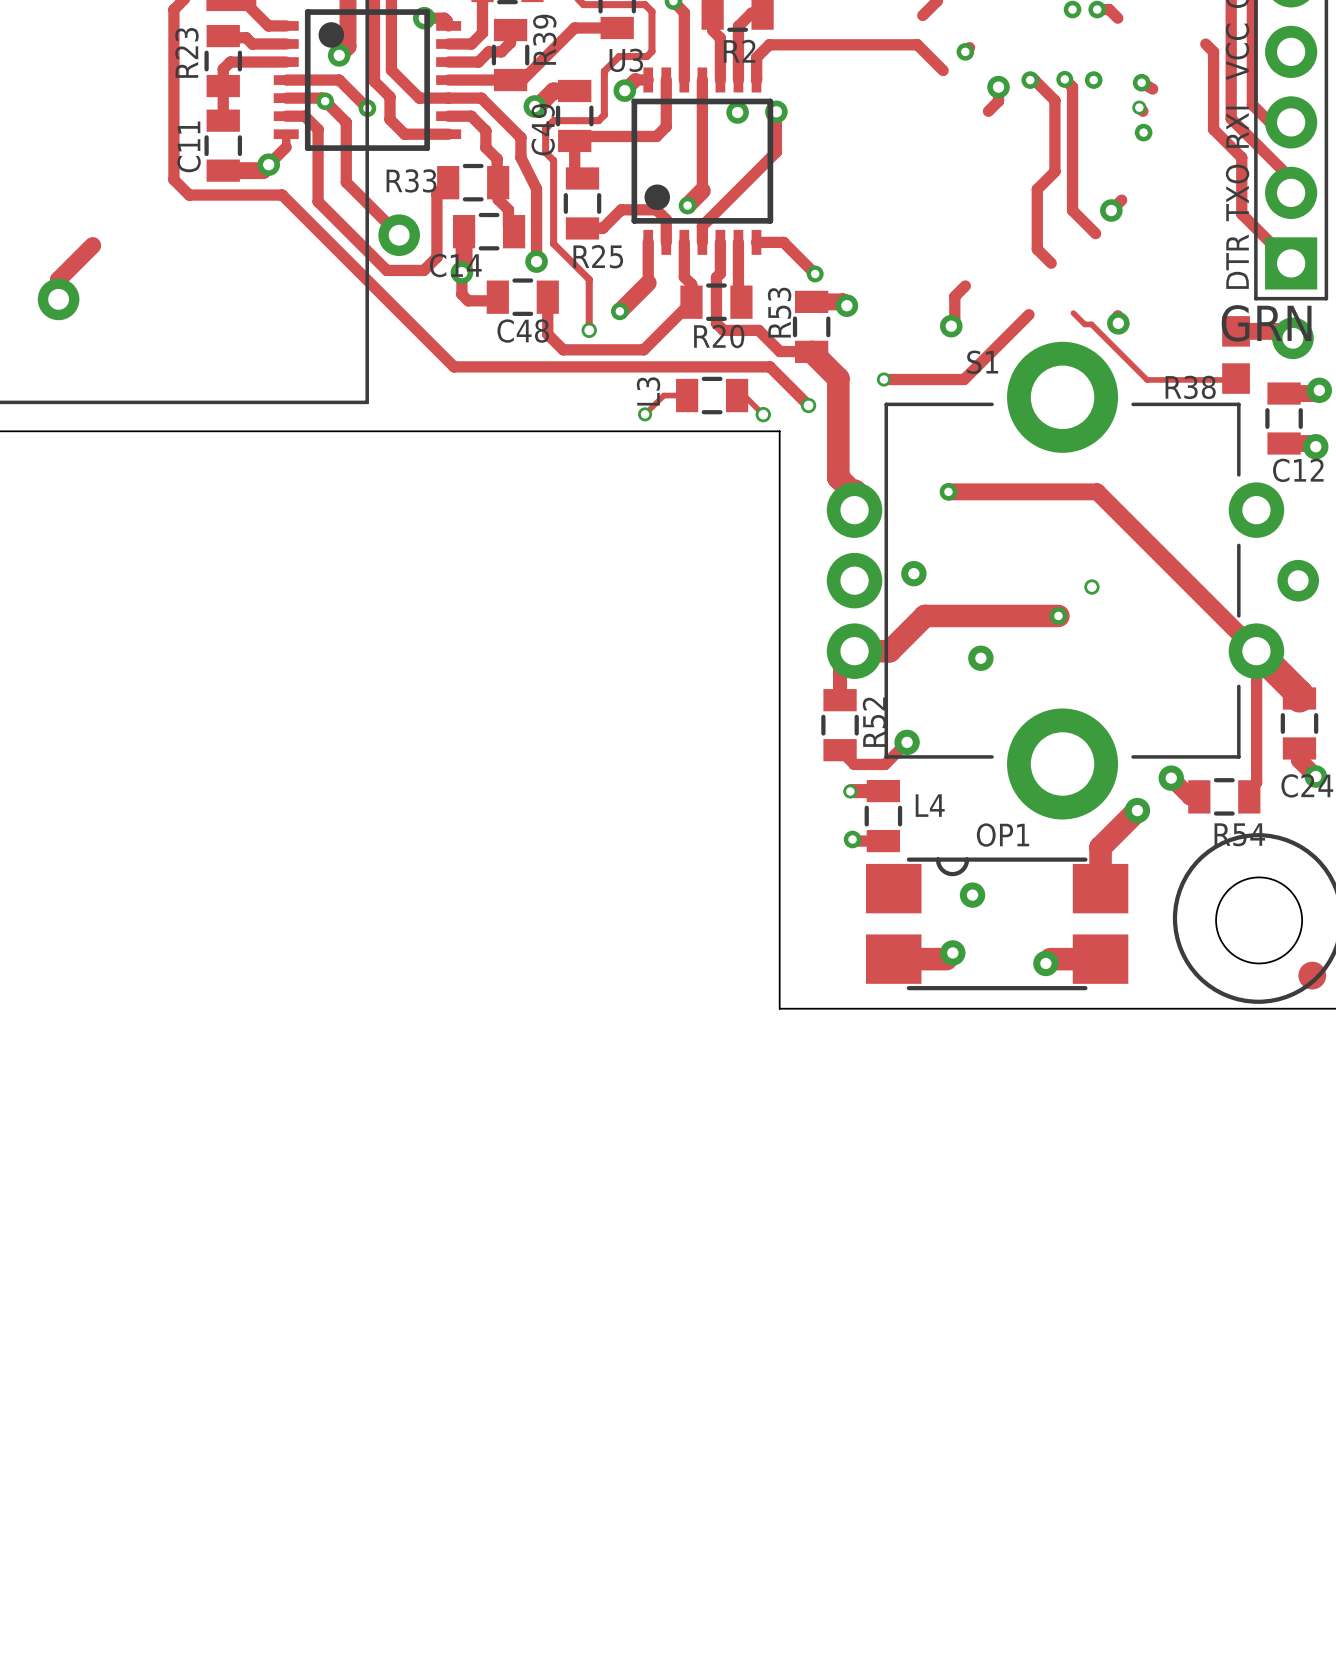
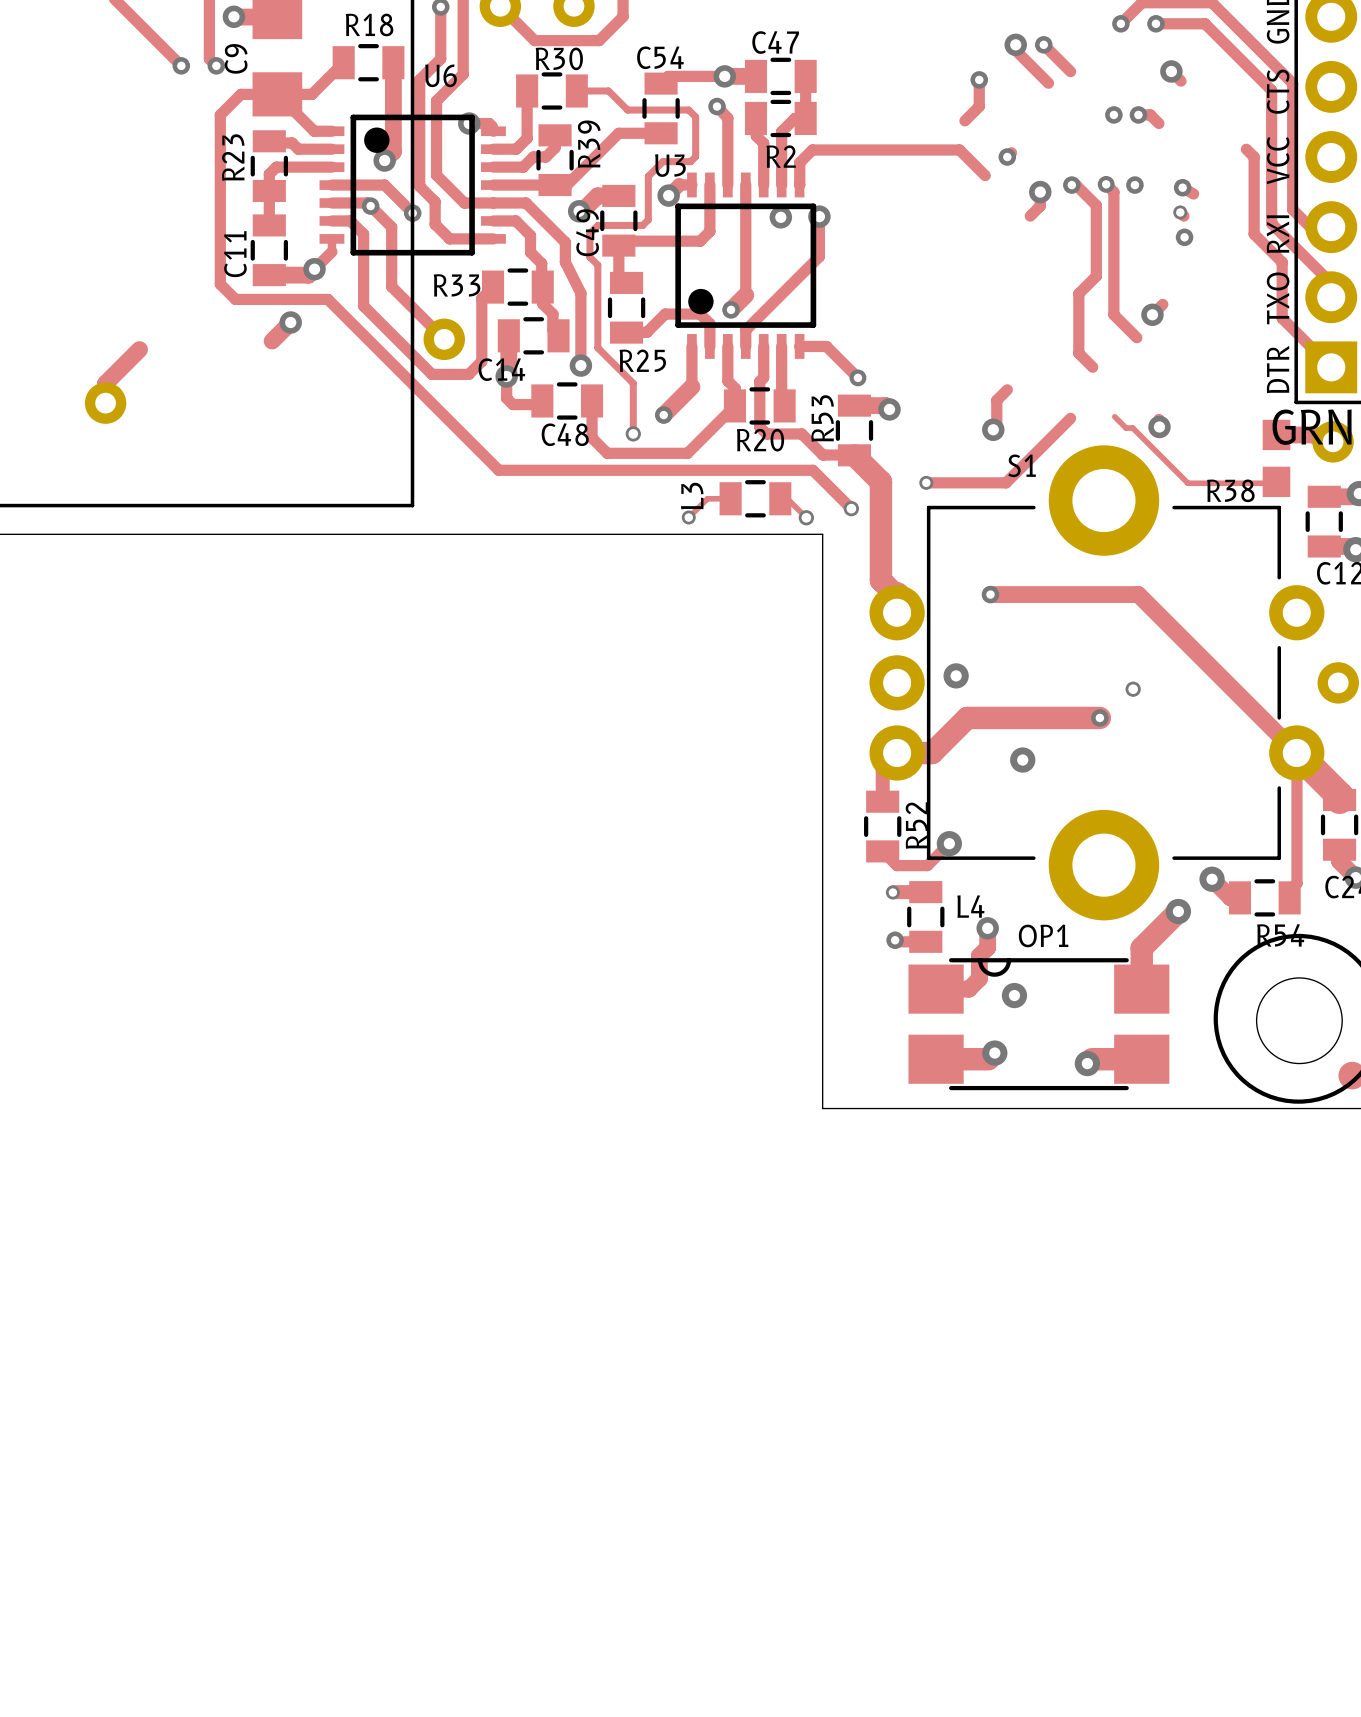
track: none -> (290, 322) (272, 341)
via: none -> (290, 322)
track: none -> (987, 928) (987, 947) (979, 955) (979, 978) (969, 989) (936, 989)
via: none -> (987, 928)

